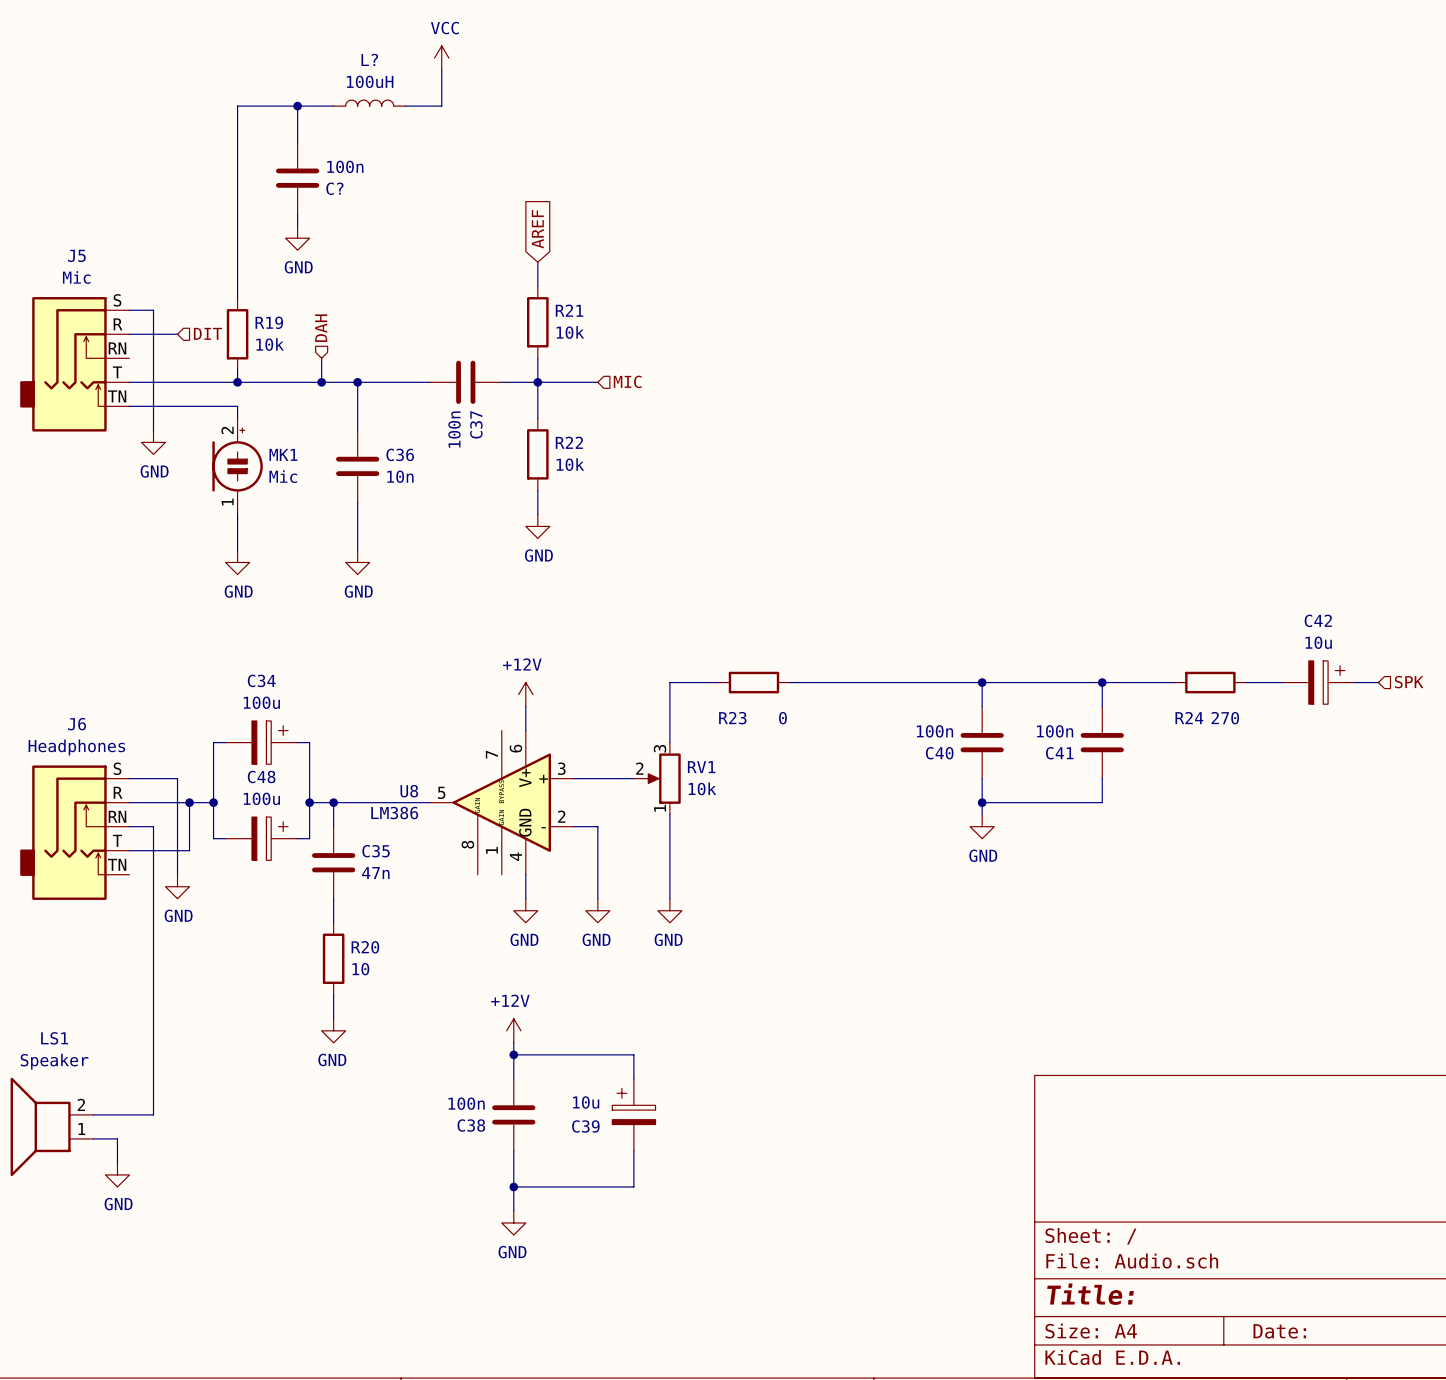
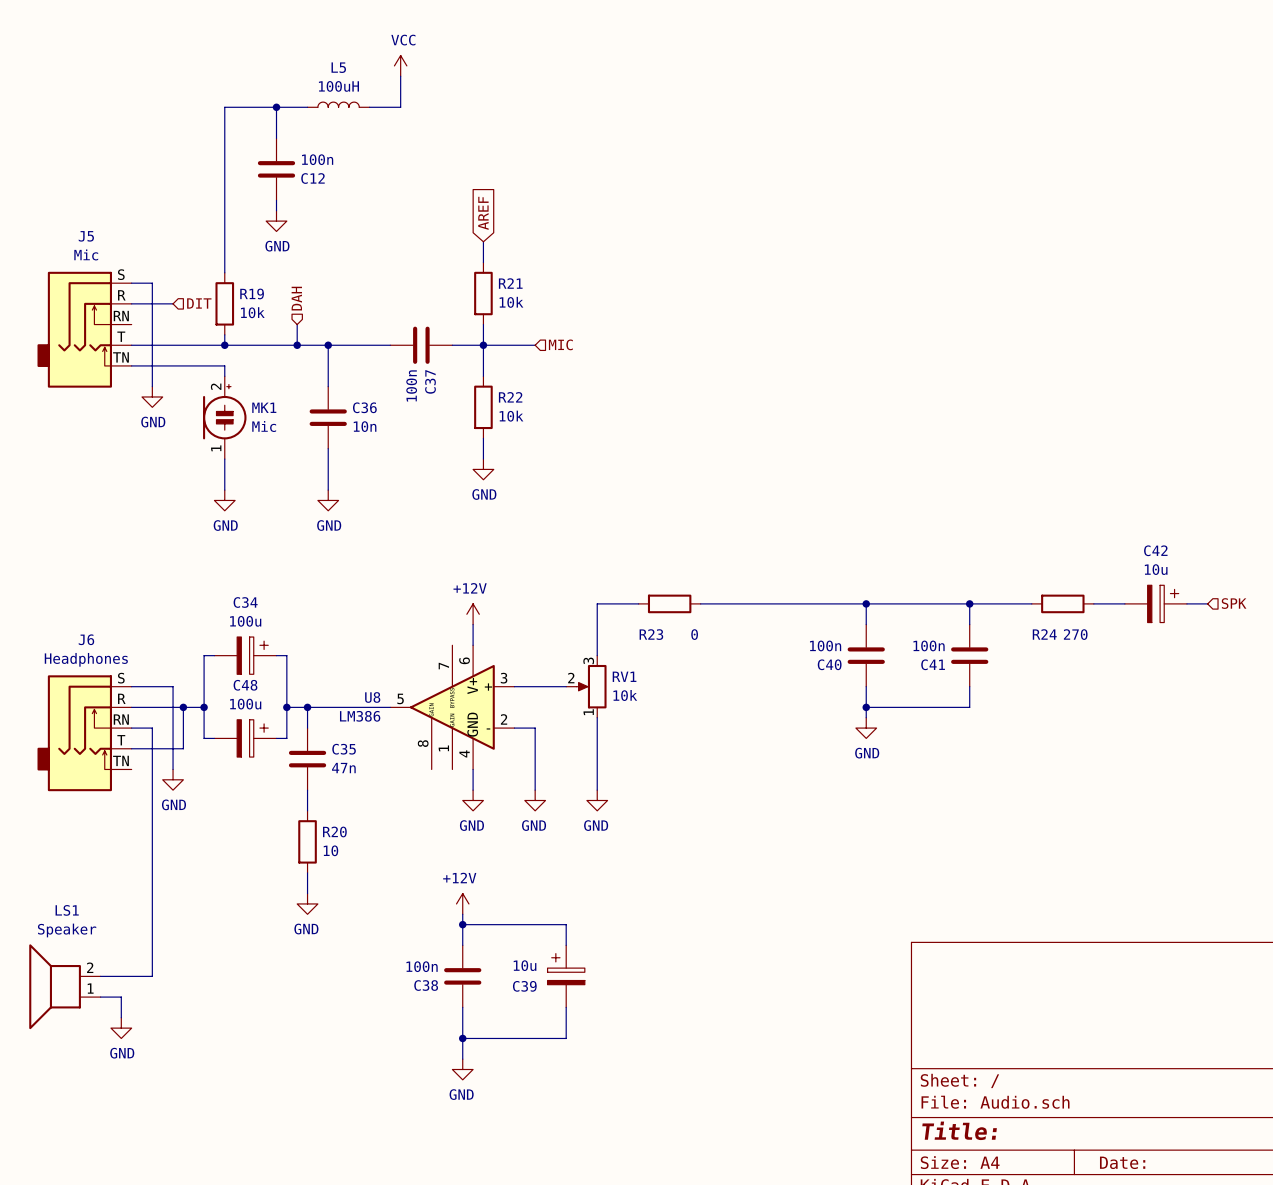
L? name: L? (369, 59) -> L5 (338, 67)
C? name: C? (334, 188) -> C12 (312, 178)

